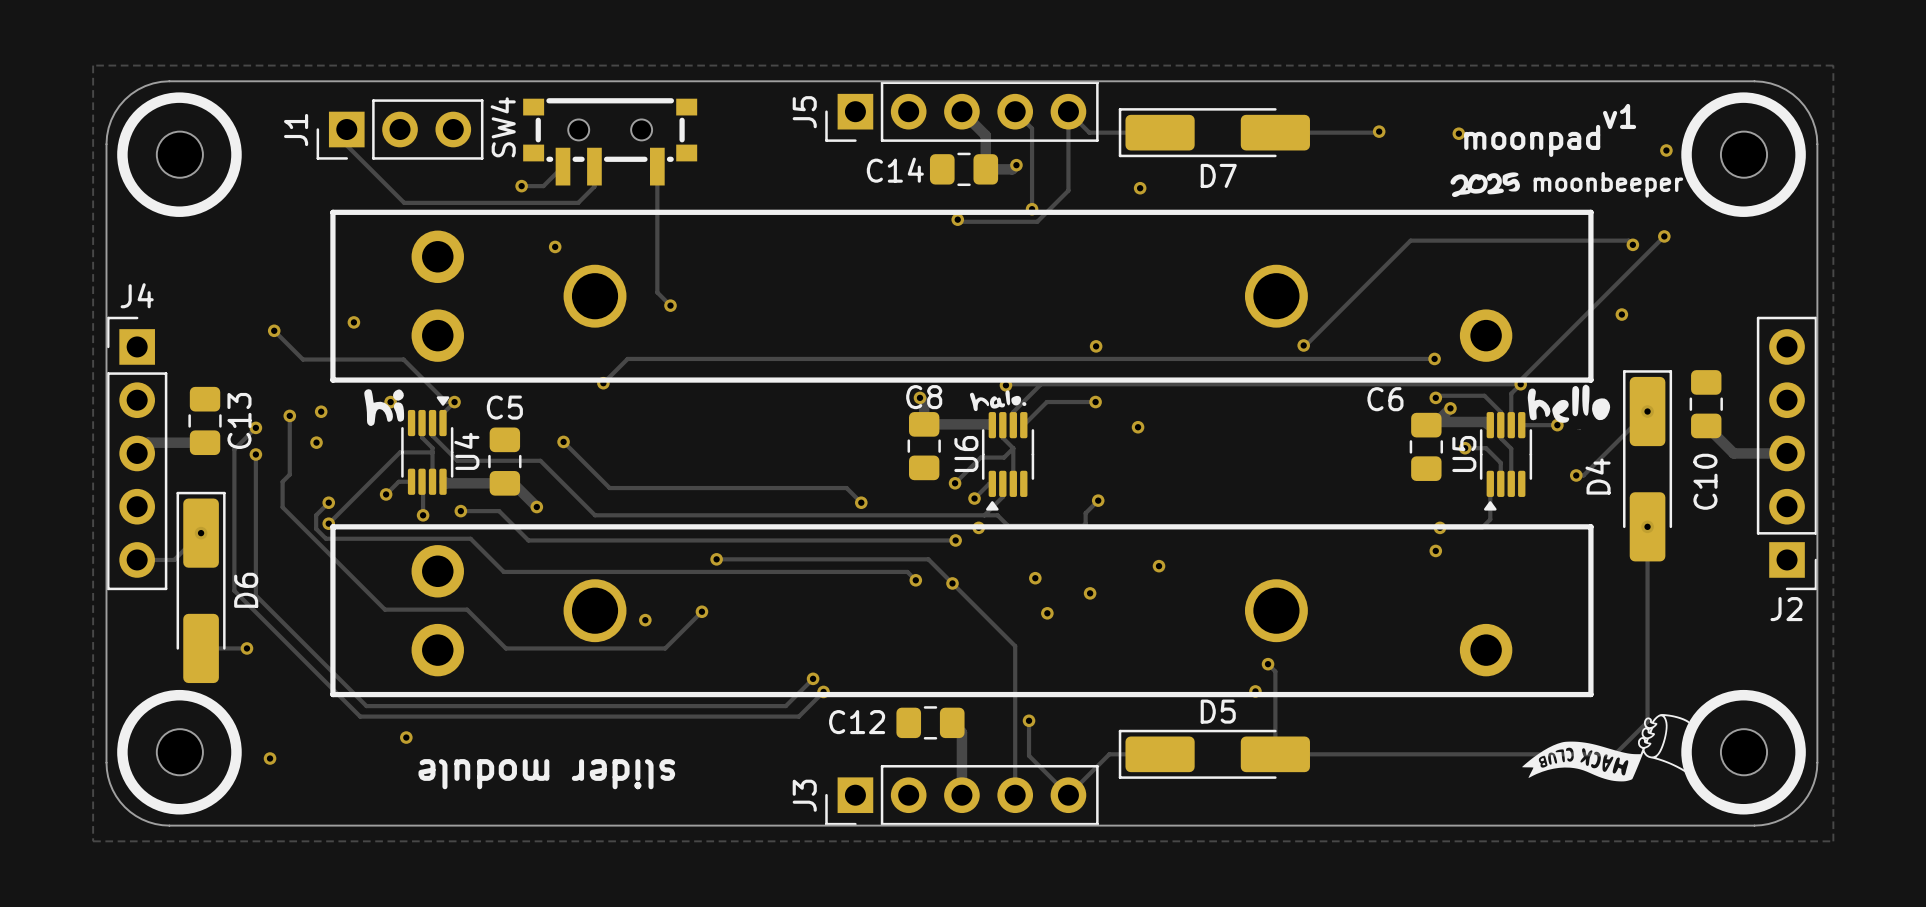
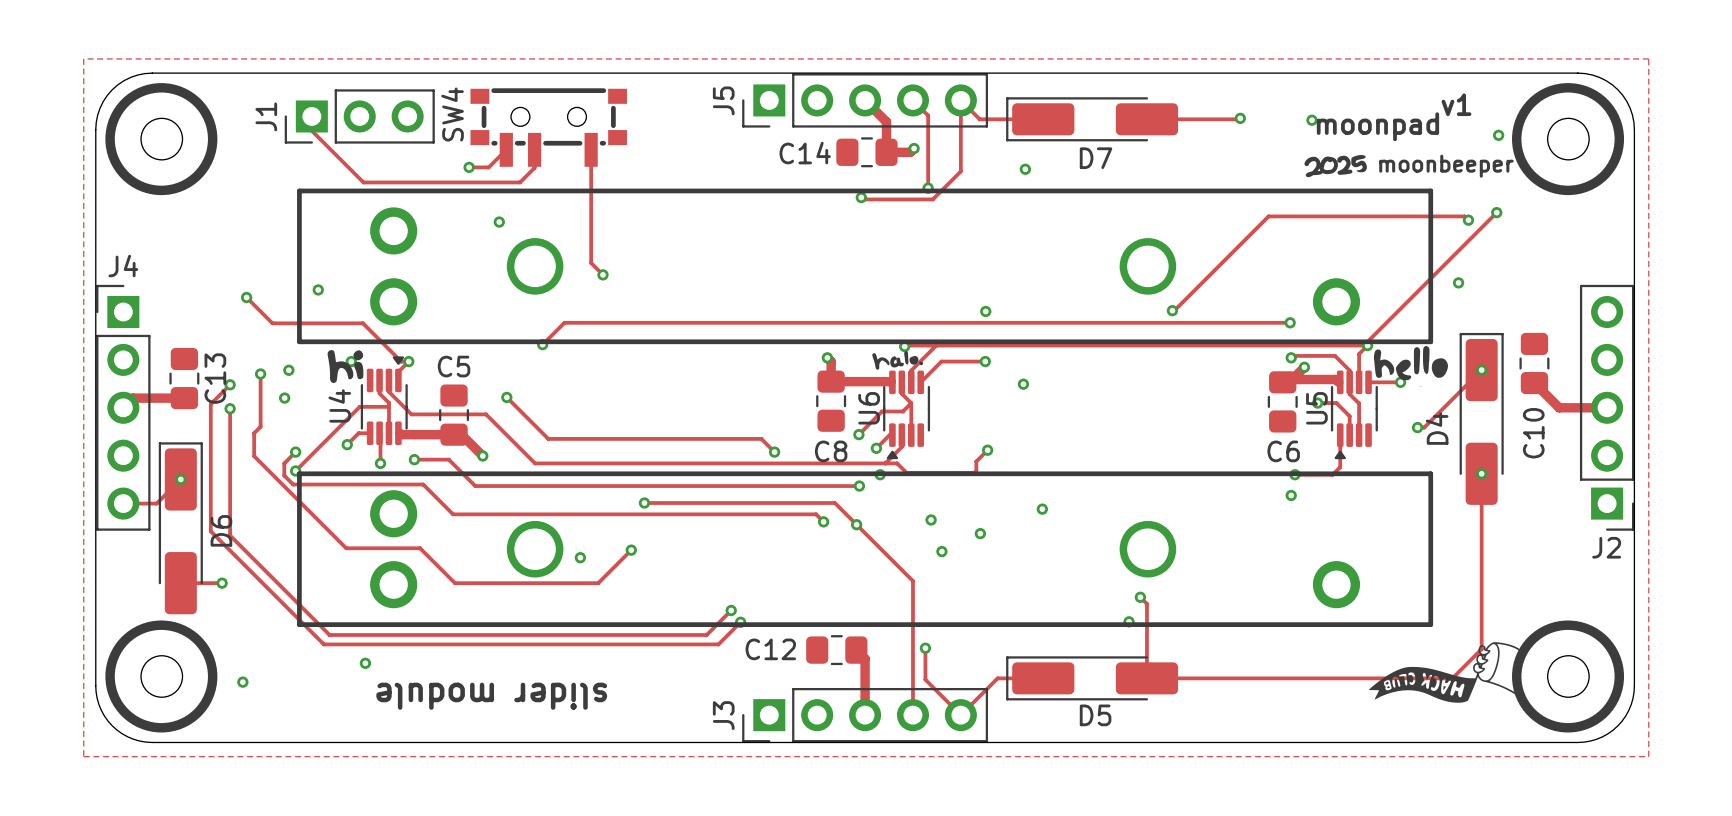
C8 name position: C8 (924, 397) -> C8 (831, 451)
C6 name position: C6 (1385, 399) -> C6 (1283, 451)
U4 name position: U4 (466, 451) -> U4 (339, 405)
D5 name position: D5 (1218, 711) -> D5 (1095, 715)

